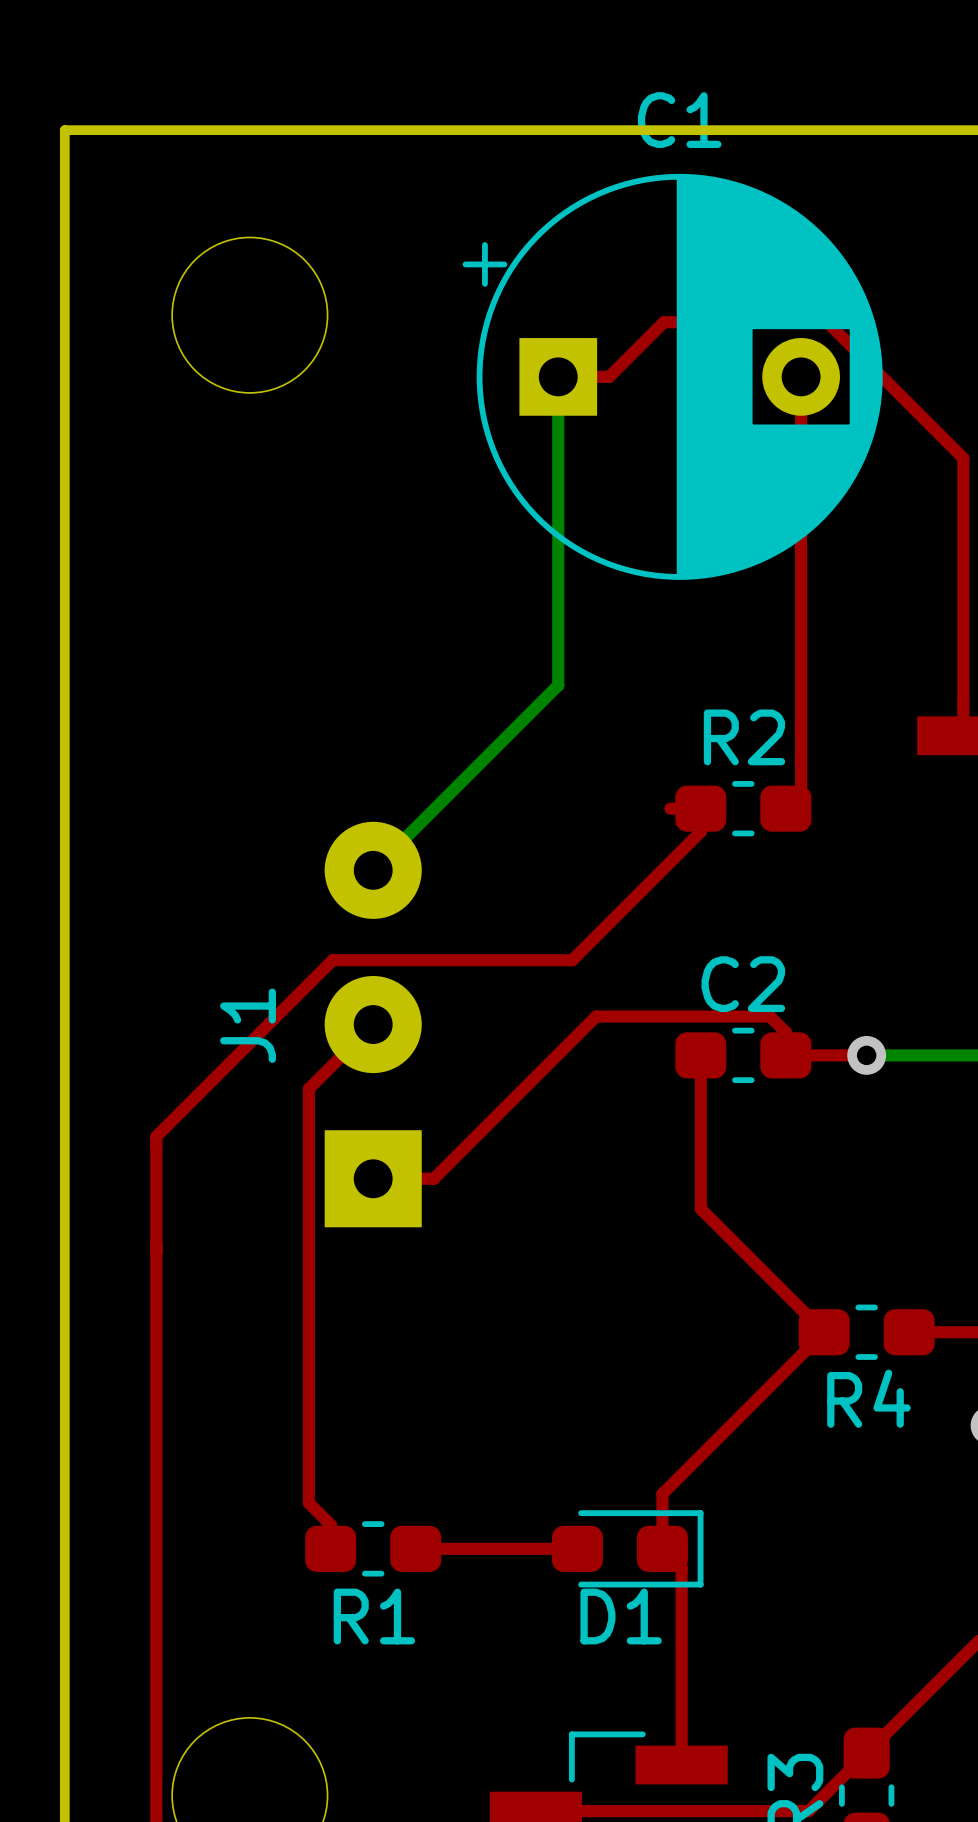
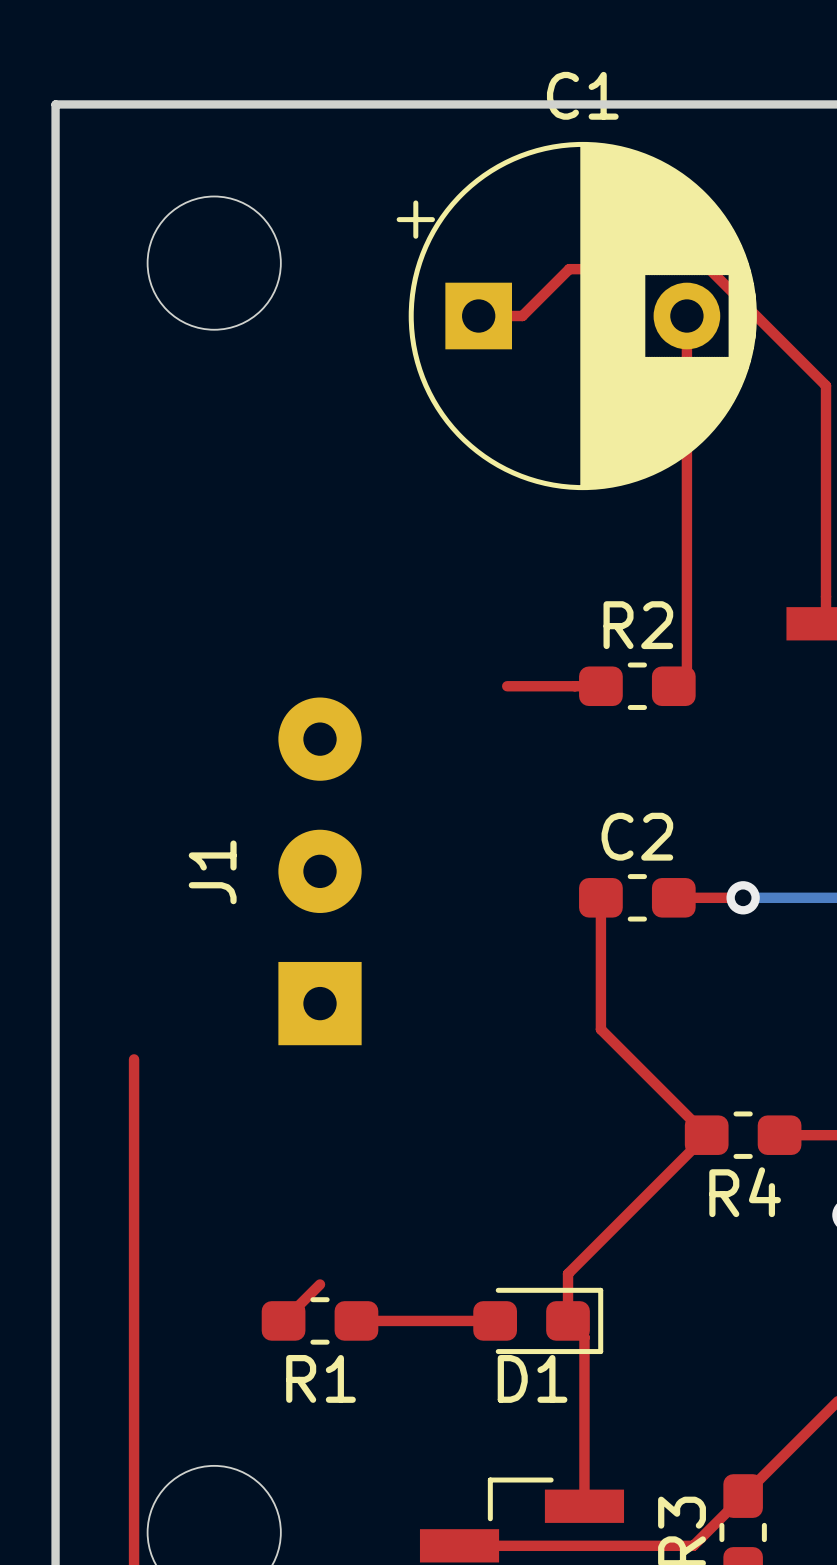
bottom track: (558, 376) (558, 685) (373, 870) -> none
top track: none -> (507, 686) (574, 686)
top track: (700, 808) (700, 831) (572, 960) (332, 960) (156, 1136) (156, 1243) -> none
top track: (373, 1024) (308, 1088) (308, 1503) (330, 1524) (330, 1548) -> (320, 1284) (283, 1320)
top track: (785, 1055) (785, 1032) (770, 1016) (596, 1016) (433, 1178) (373, 1178) -> none

